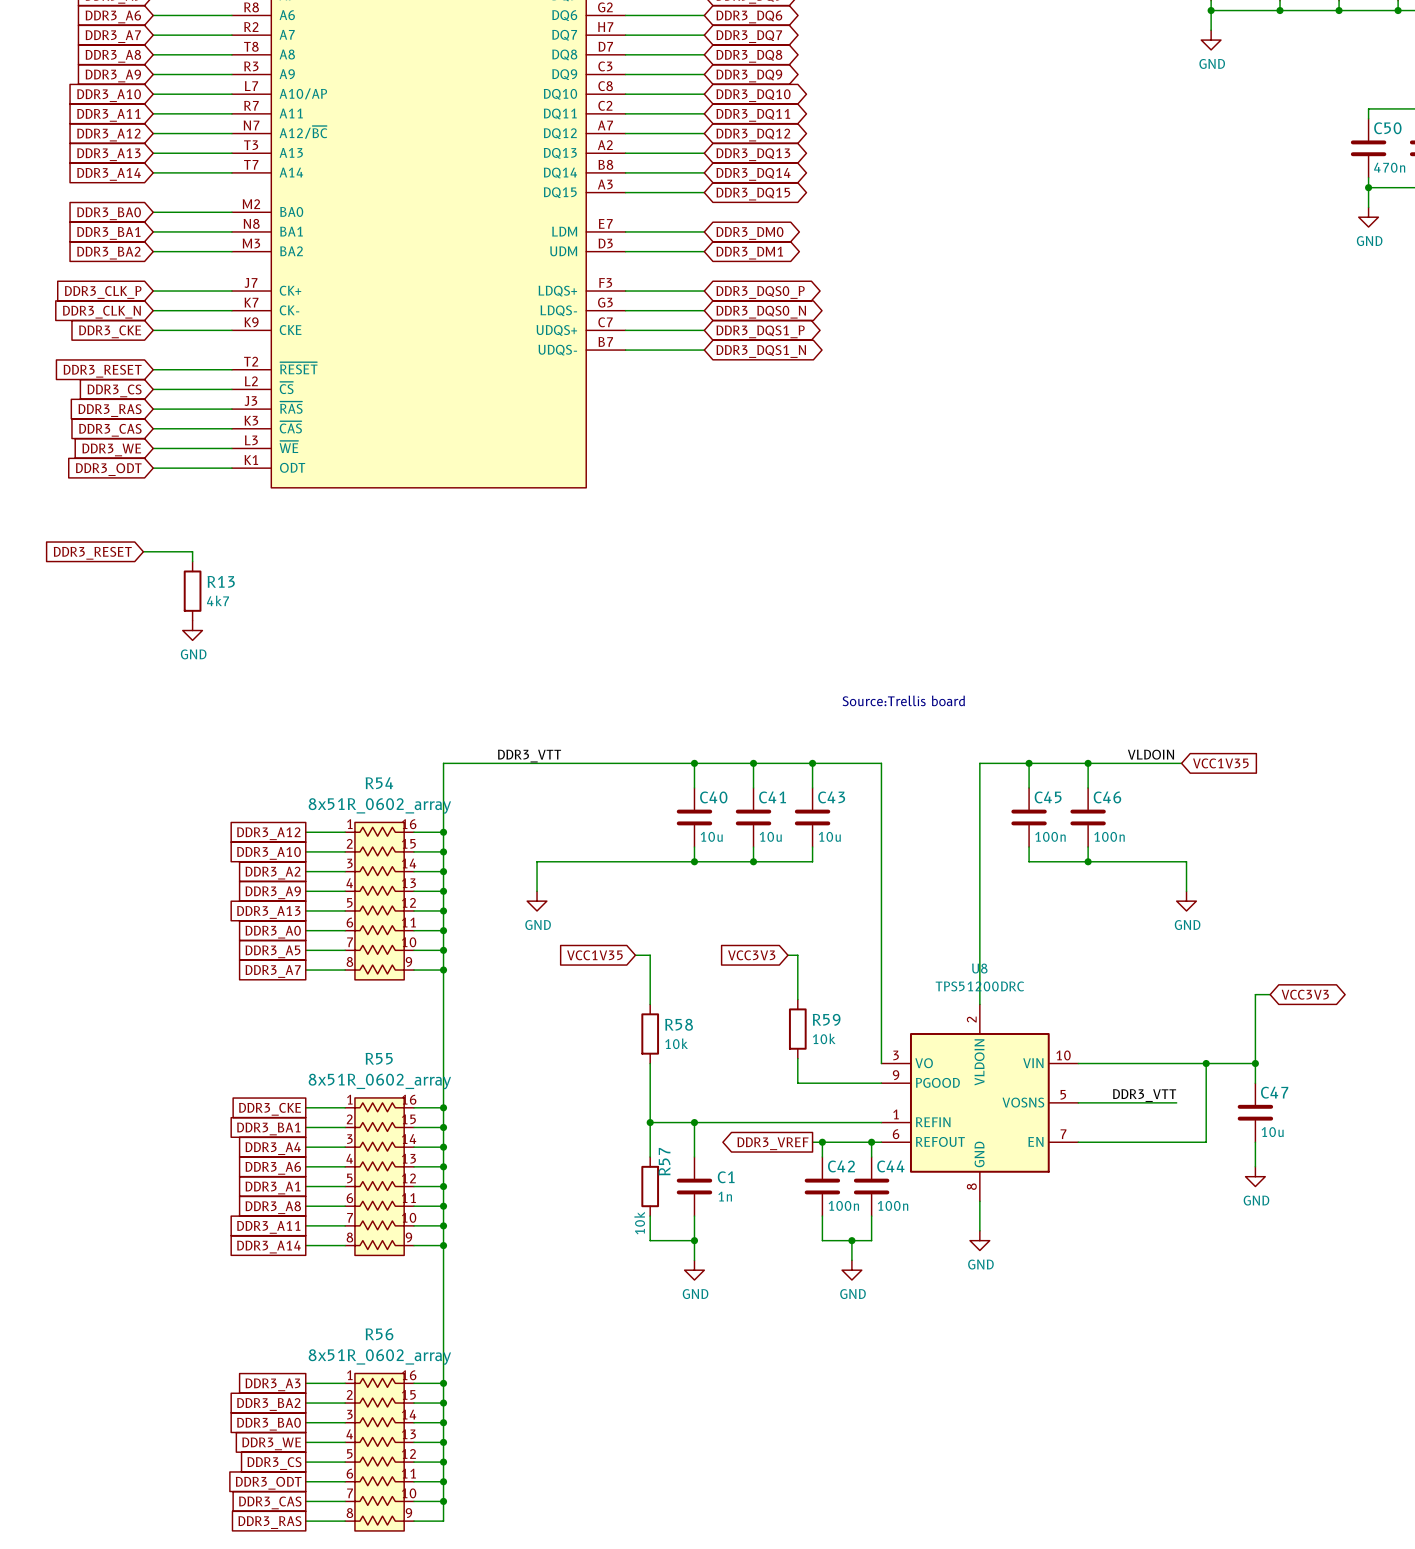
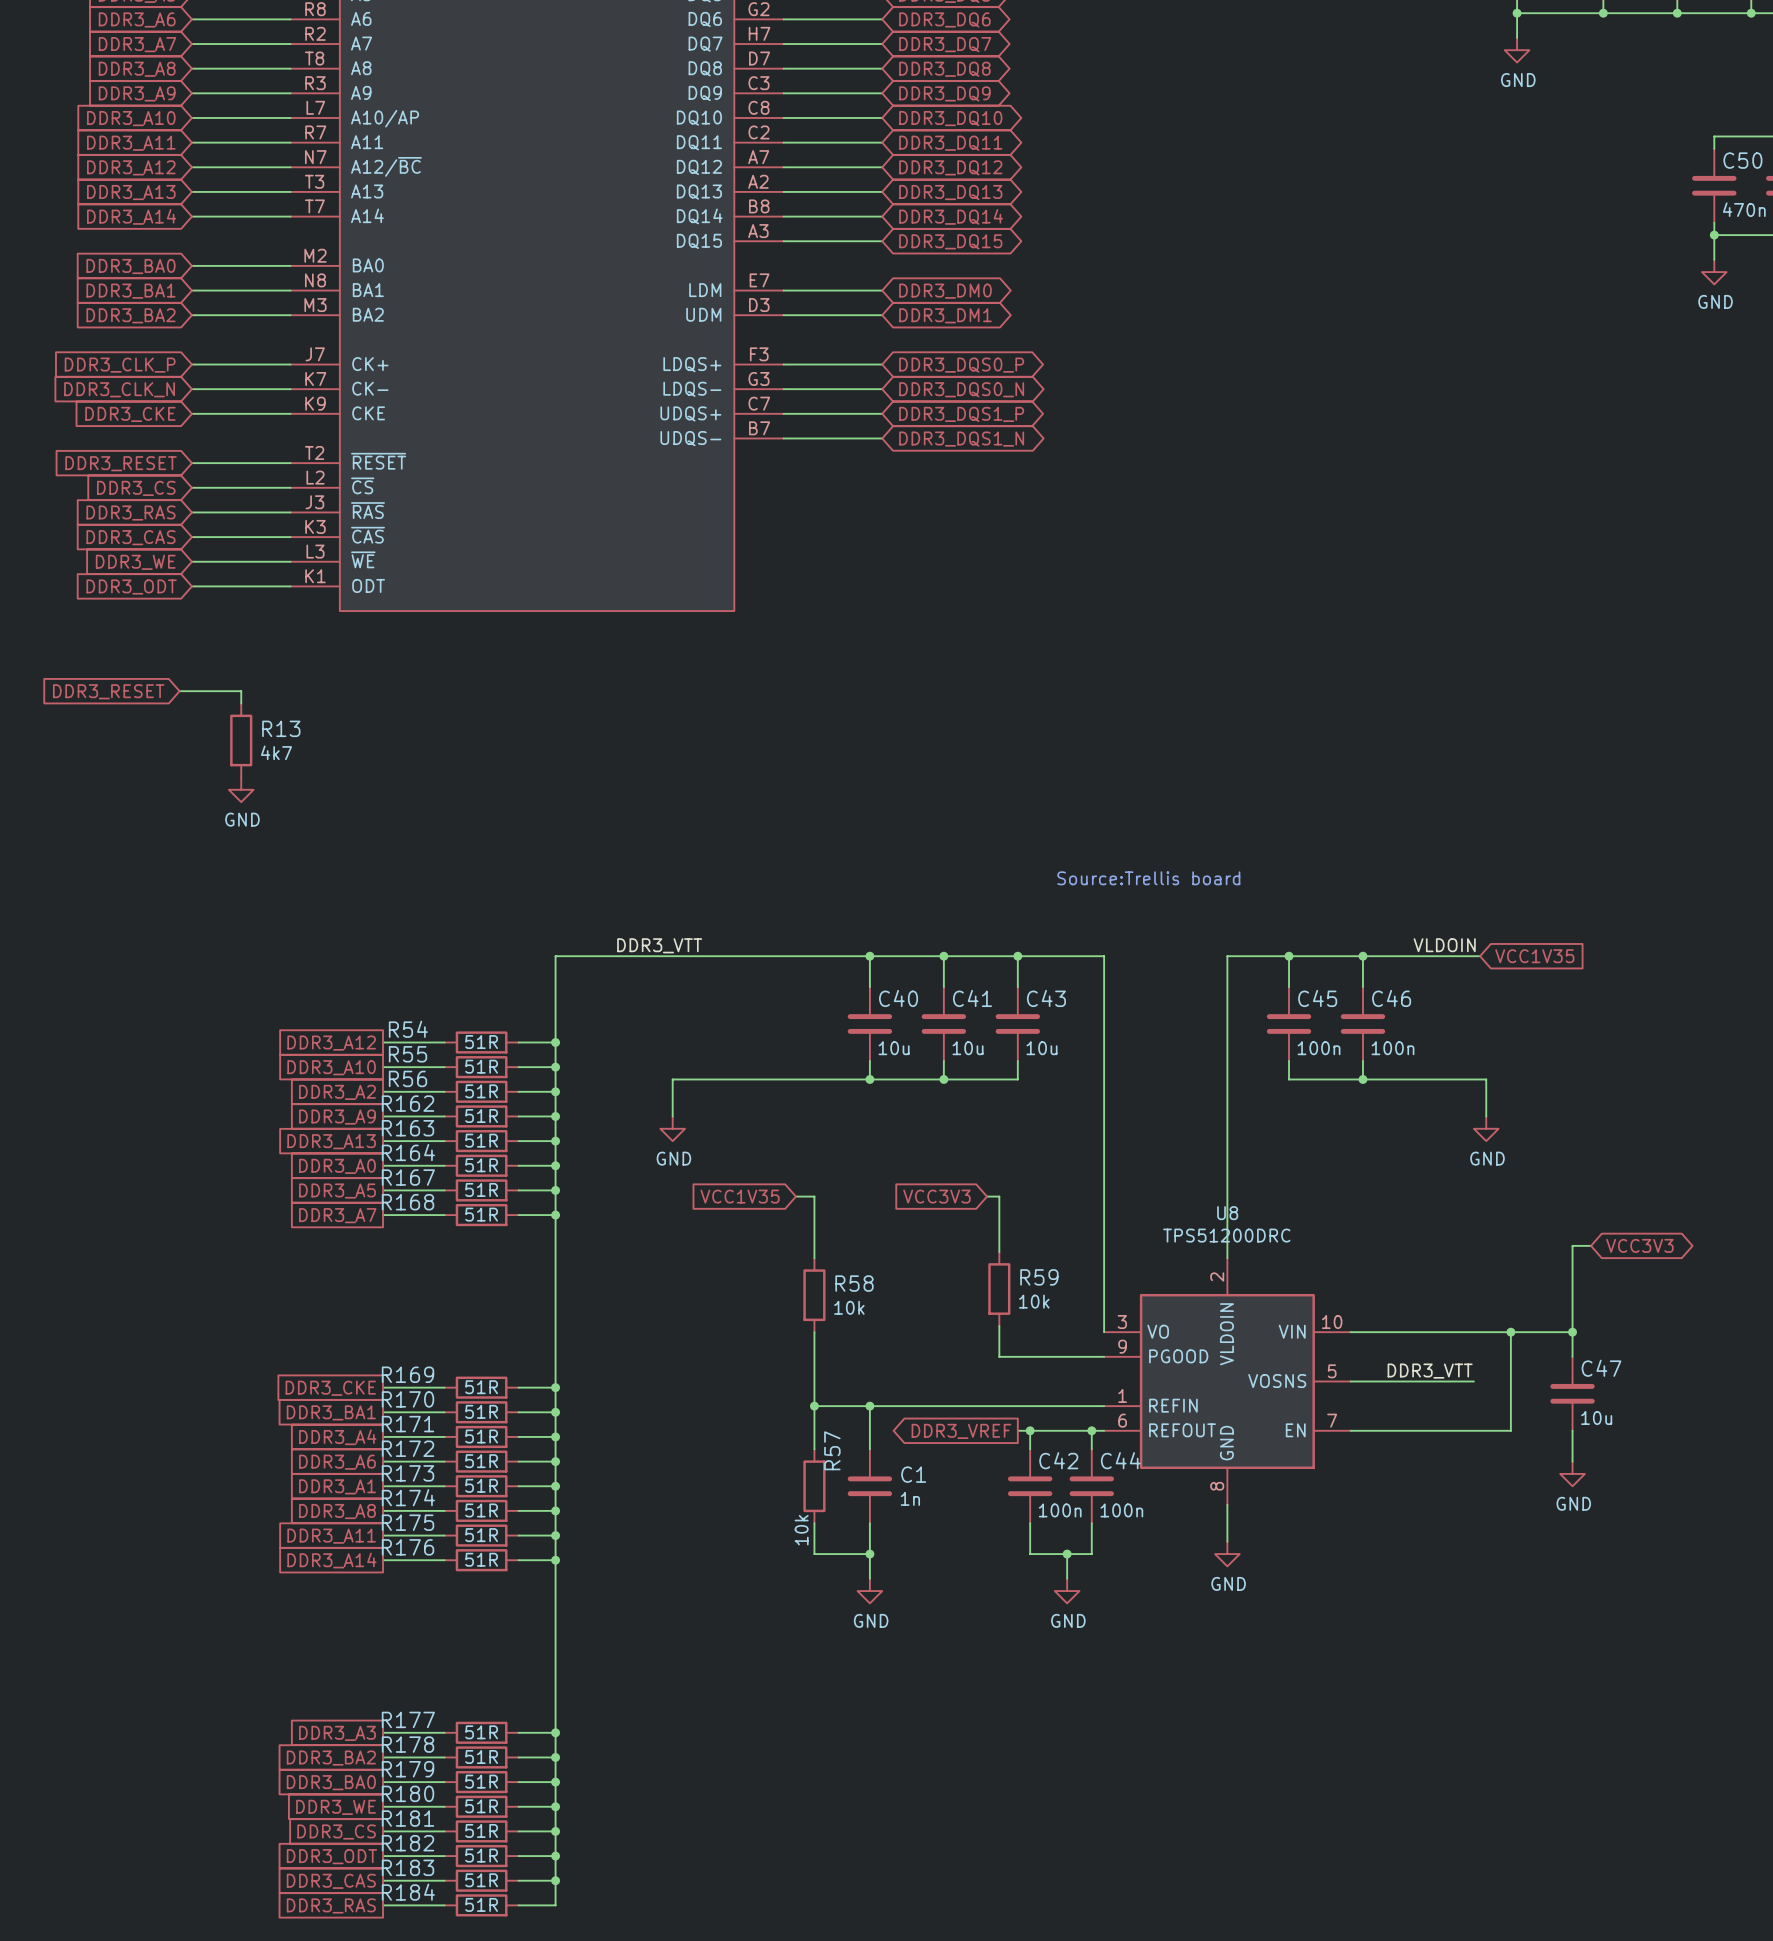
R54 name position: R54 (379, 783) -> R54 (408, 1029)
R54 value: 8x51R_0602_array (379, 805) -> none
R54 symbol: [345, 822, 415, 980] -> [444, 1031, 519, 1054]
R54 text: none -> 51R (481, 1042)
R55 text: none -> 51R (481, 1066)
R56 text: none -> 51R (481, 1091)
R162: none -> (481, 1116)
R163: none -> (481, 1141)
R164: none -> (481, 1165)
R167: none -> (481, 1190)
R168: none -> (481, 1215)
R55 name position: R55 (379, 1058) -> R55 (408, 1054)
R55 value: 8x51R_0602_array (379, 1081) -> none
R55 symbol: [345, 1097, 415, 1256] -> [444, 1056, 519, 1079]
R169: none -> (481, 1387)
R170: none -> (481, 1412)
R171: none -> (481, 1436)
R172: none -> (481, 1461)
R173: none -> (481, 1486)
R174: none -> (481, 1510)
R175: none -> (481, 1535)
R176: none -> (481, 1560)
R56 name position: R56 (379, 1334) -> R56 (408, 1078)
R56 value: 8x51R_0602_array (379, 1357) -> none
R56 symbol: [345, 1373, 415, 1531] -> [444, 1080, 519, 1103]
R177: none -> (481, 1732)
R178: none -> (481, 1757)
R179: none -> (481, 1782)
R180: none -> (481, 1806)
R181: none -> (481, 1831)
R182: none -> (481, 1856)
R183: none -> (481, 1880)
R184: none -> (481, 1905)

